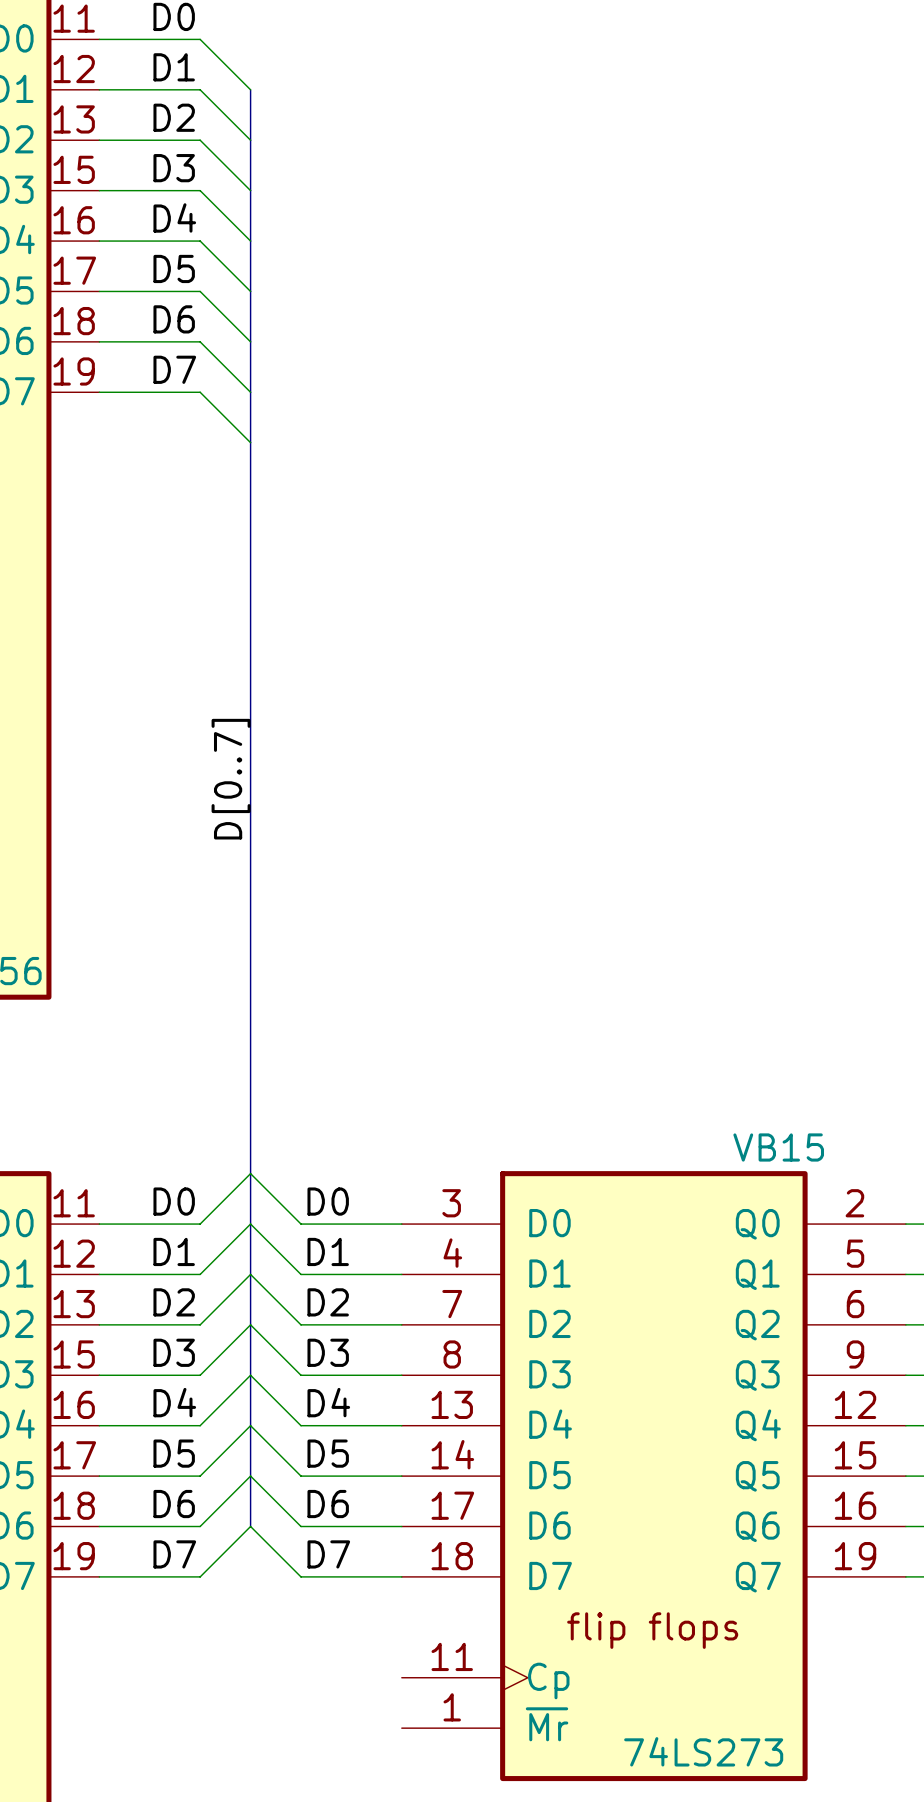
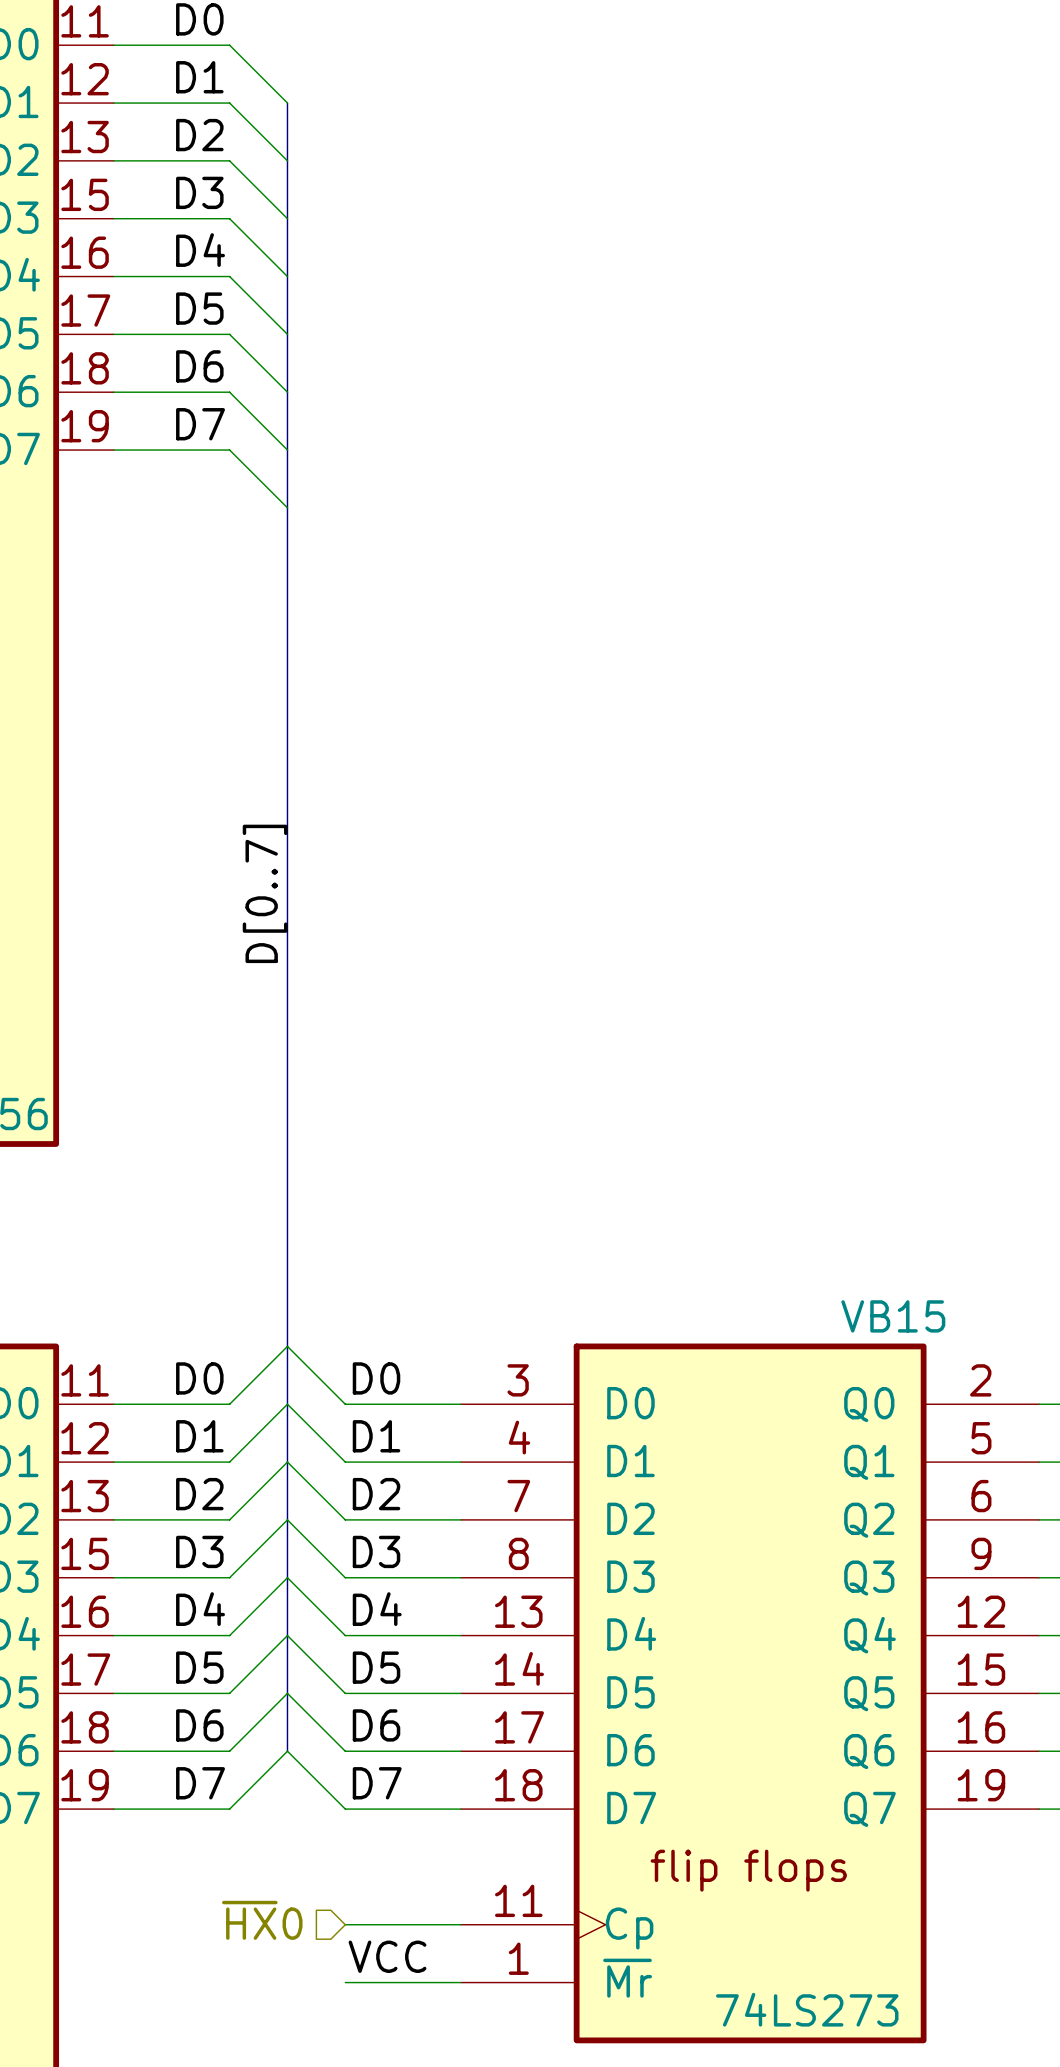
hierarchical label: none -> ~{HX}0 (262, 1920)
wire: none -> (345, 1924) (460, 1924)
label: none -> VCC (387, 1956)
wire: none -> (345, 1982) (460, 1982)

